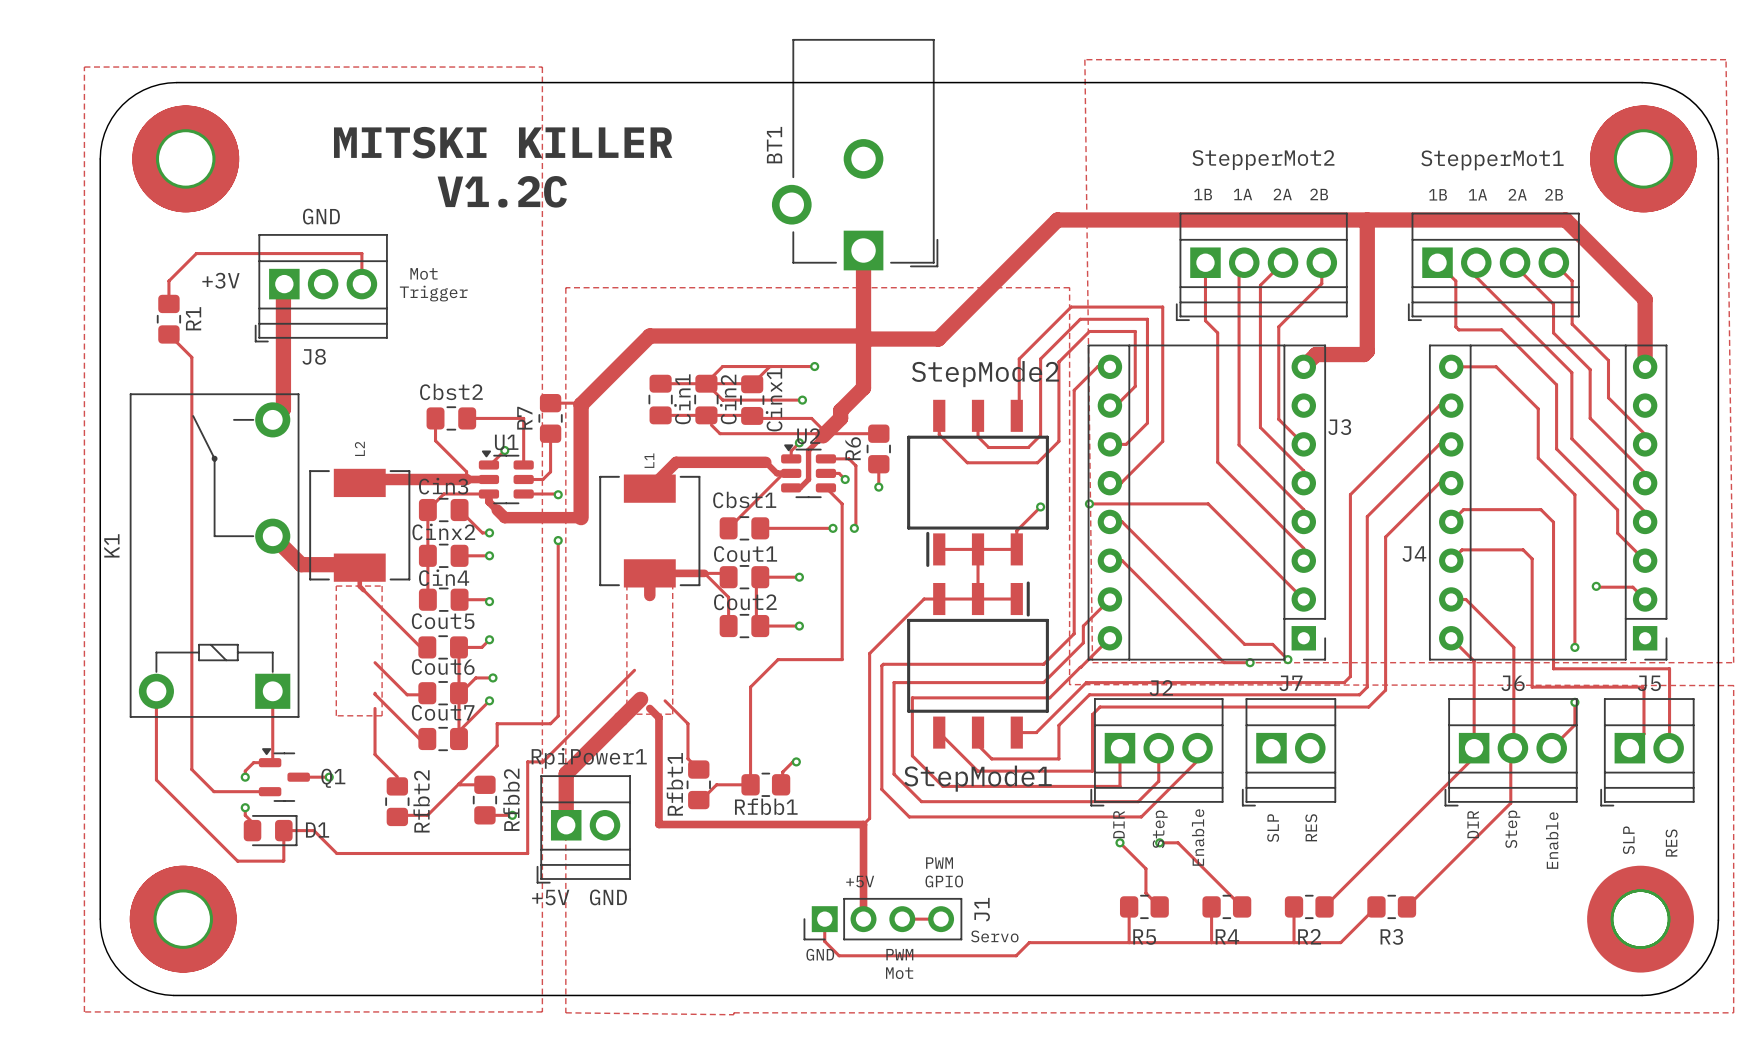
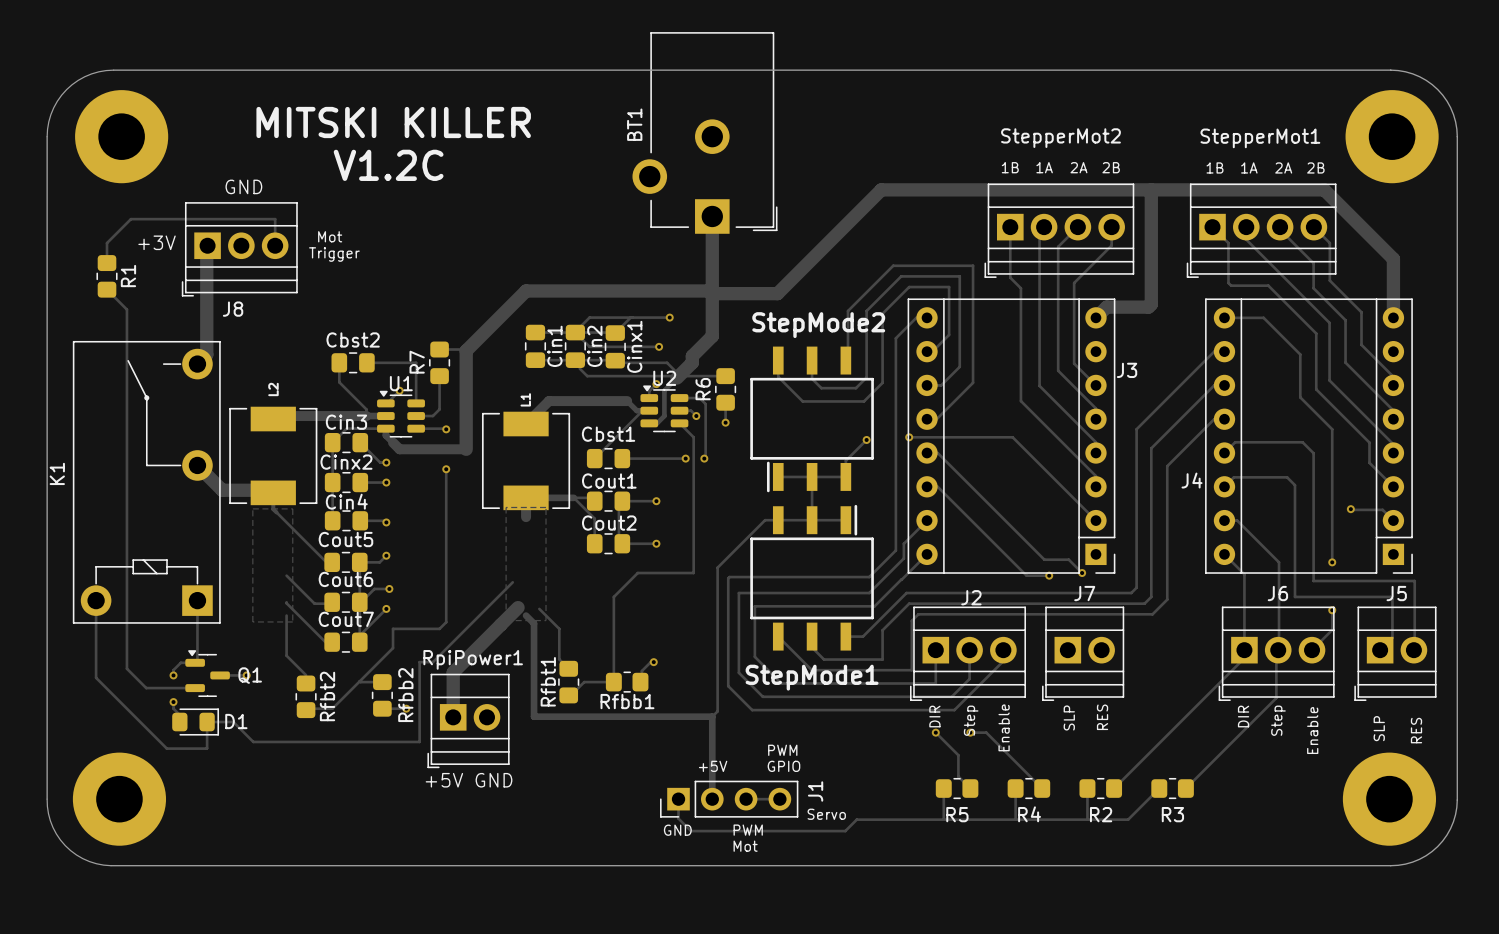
zone outline: (1084, 59) (1092, 662) (1733, 662) (1726, 59) (1084, 59) -> none
zone outline: (84, 67) (84, 1011) (542, 1011) (542, 67) (84, 67) -> none
part: (185, 158) -> none
part: (1643, 158) -> none
zone outline: (565, 287) (565, 1012) (733, 1014) (733, 1012) (1733, 1012) (1733, 685) (1069, 684) (1069, 287) (565, 287) -> none
part: (183, 919) -> none
part: (1640, 919) -> none

